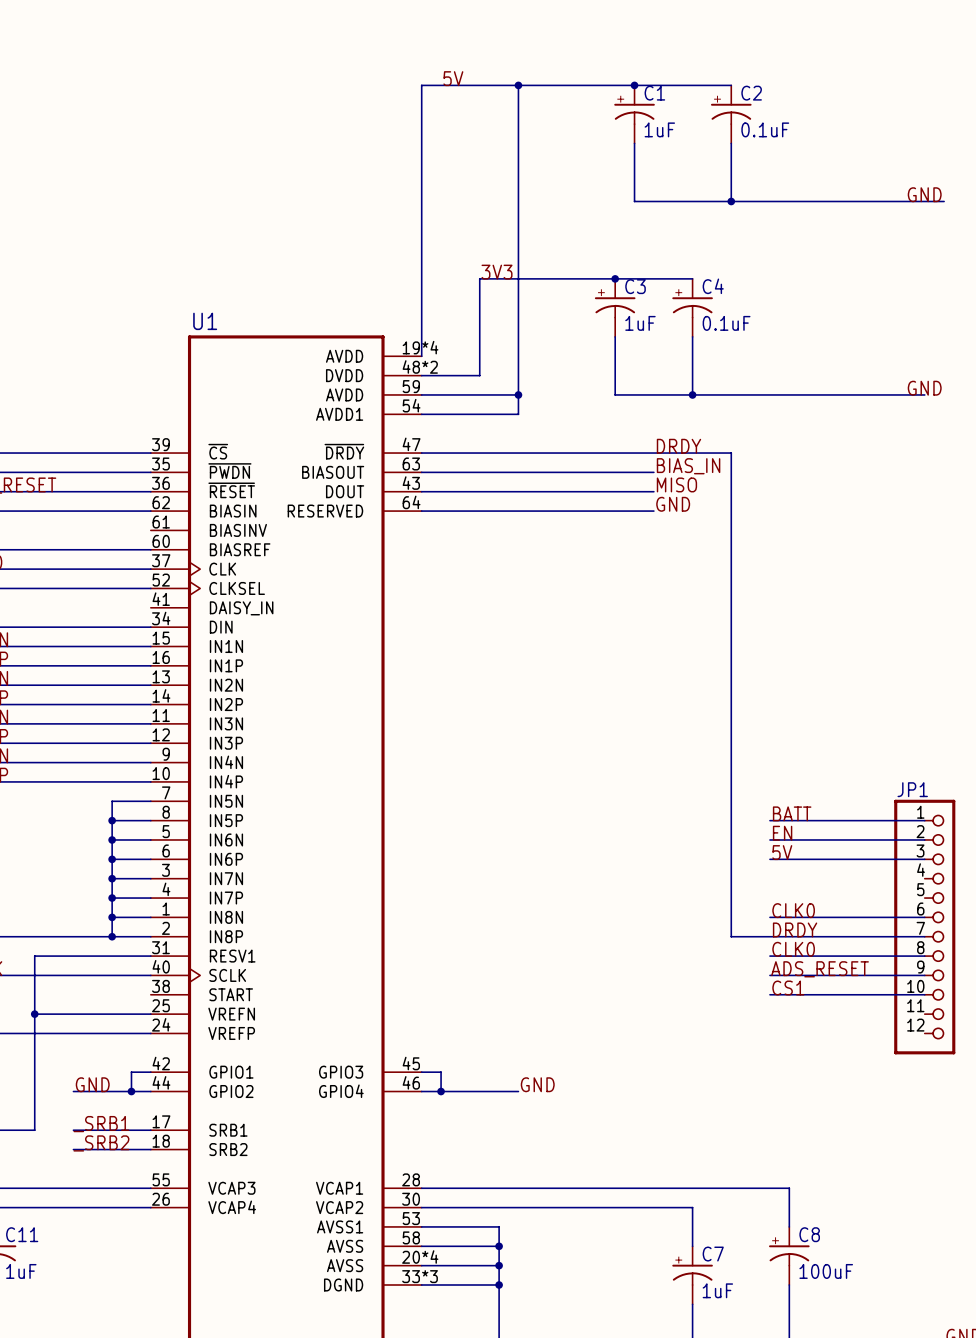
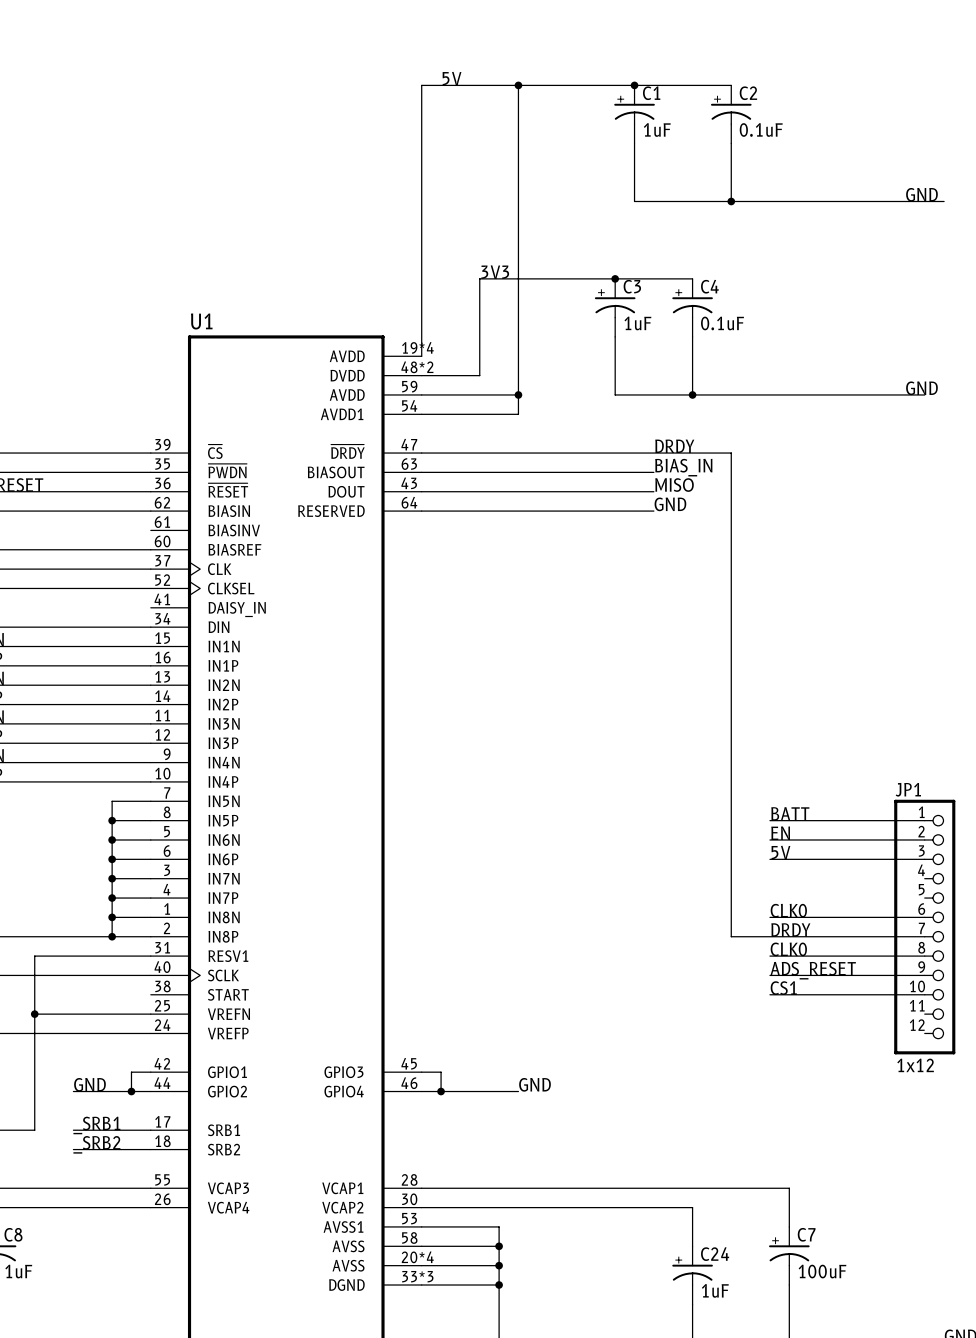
JP1 value: none -> 1x12 (915, 1065)
C11 name: C11 (22, 1234) -> C8 (13, 1234)
C8 name: C8 (809, 1234) -> C7 (806, 1234)
C7 name: C7 (713, 1254) -> C24 (715, 1254)

